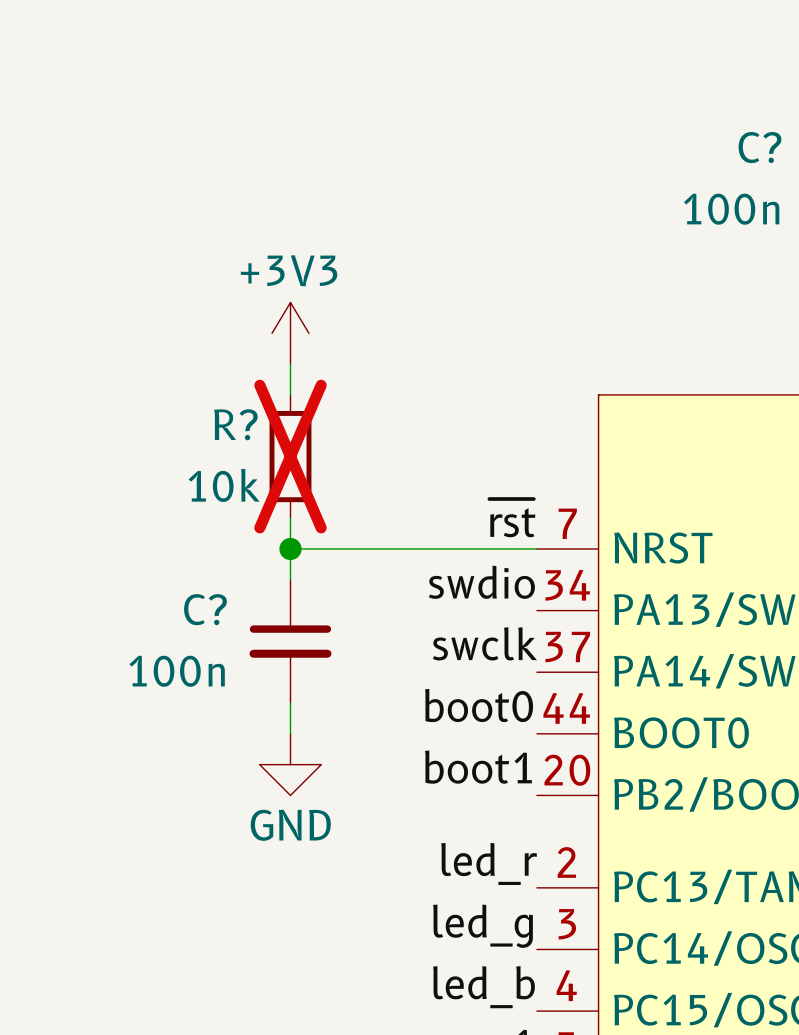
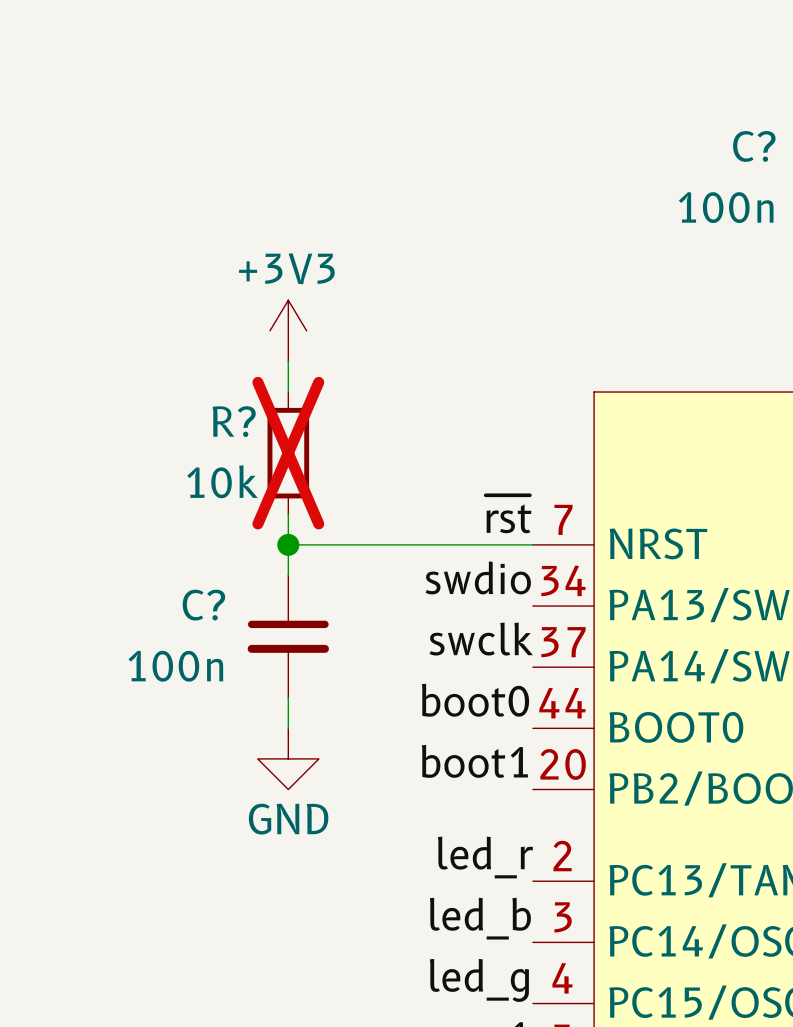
label: led_g (483, 926) -> led_b (480, 918)
label: led_b (484, 987) -> led_g (479, 980)

